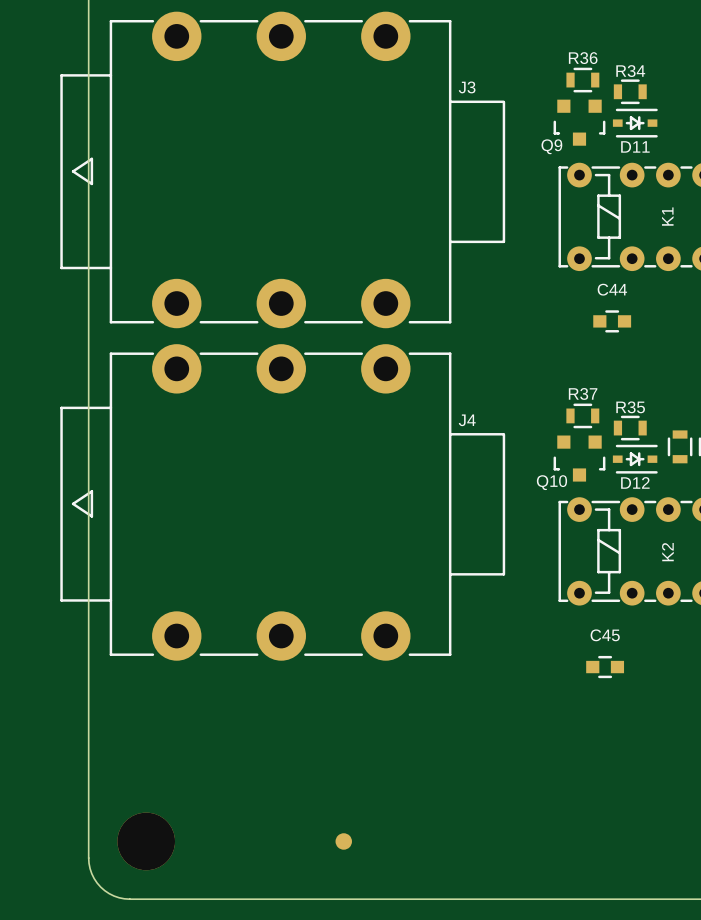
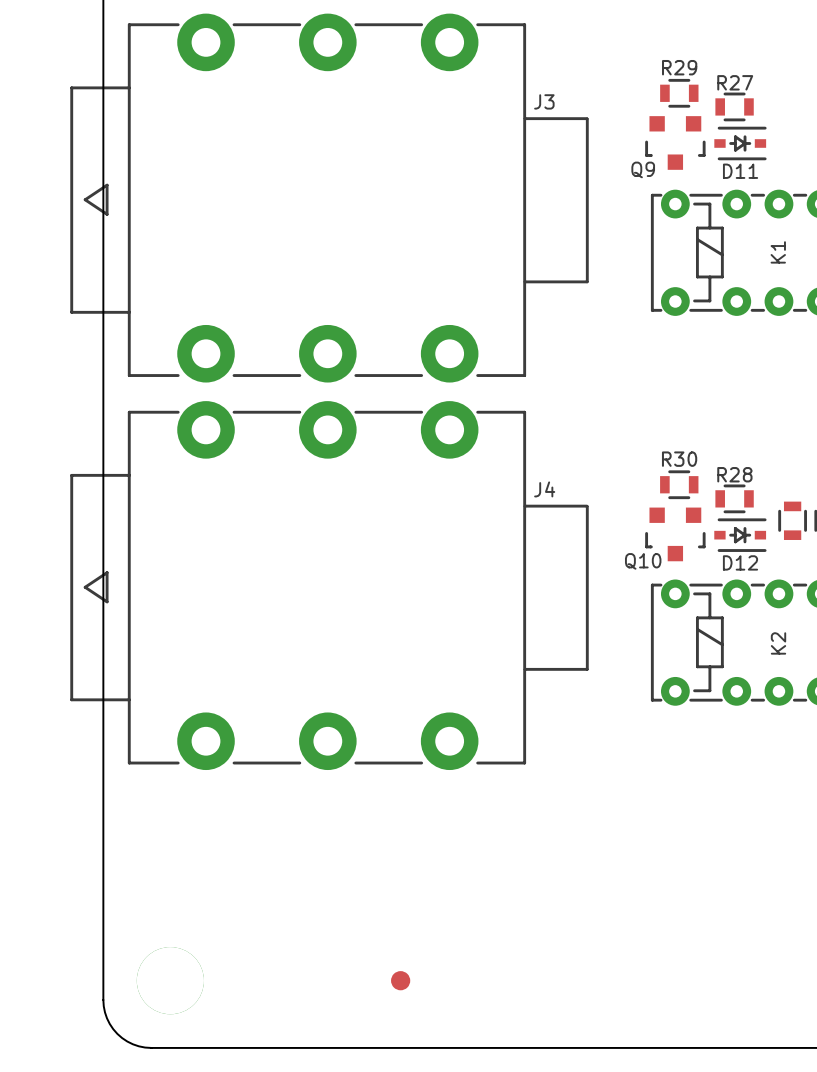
R36 name: R36 (583, 58) -> R29 (679, 67)
R34 name: R34 (630, 71) -> R27 (735, 82)
C44: (612, 321) -> none
R37 name: R37 (583, 393) -> R30 (679, 459)
R35 name: R35 (630, 407) -> R28 (734, 474)
C45: (605, 667) -> none

